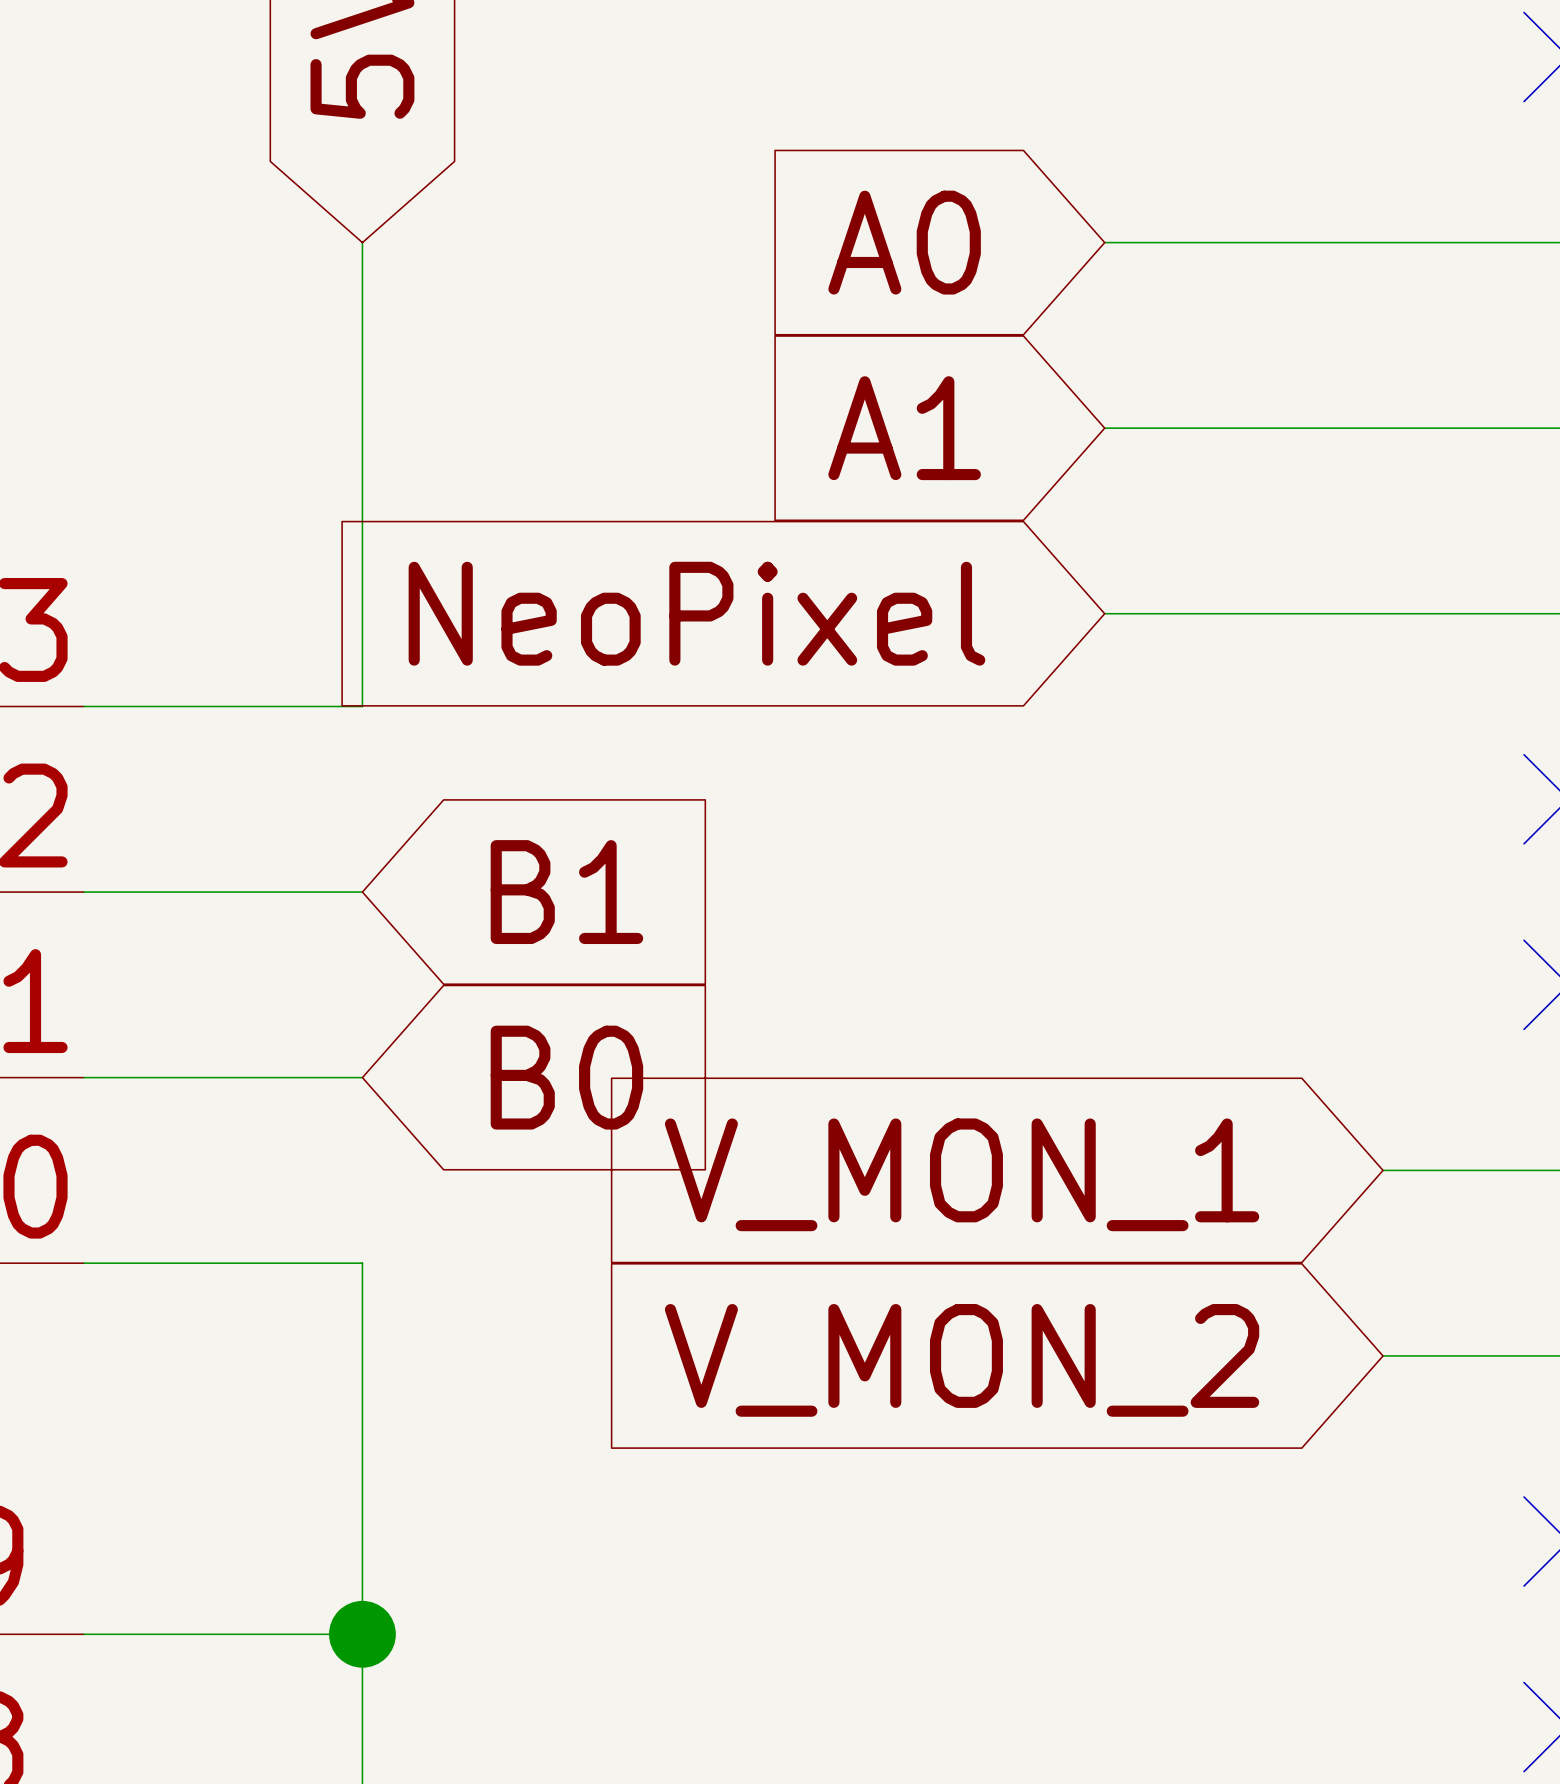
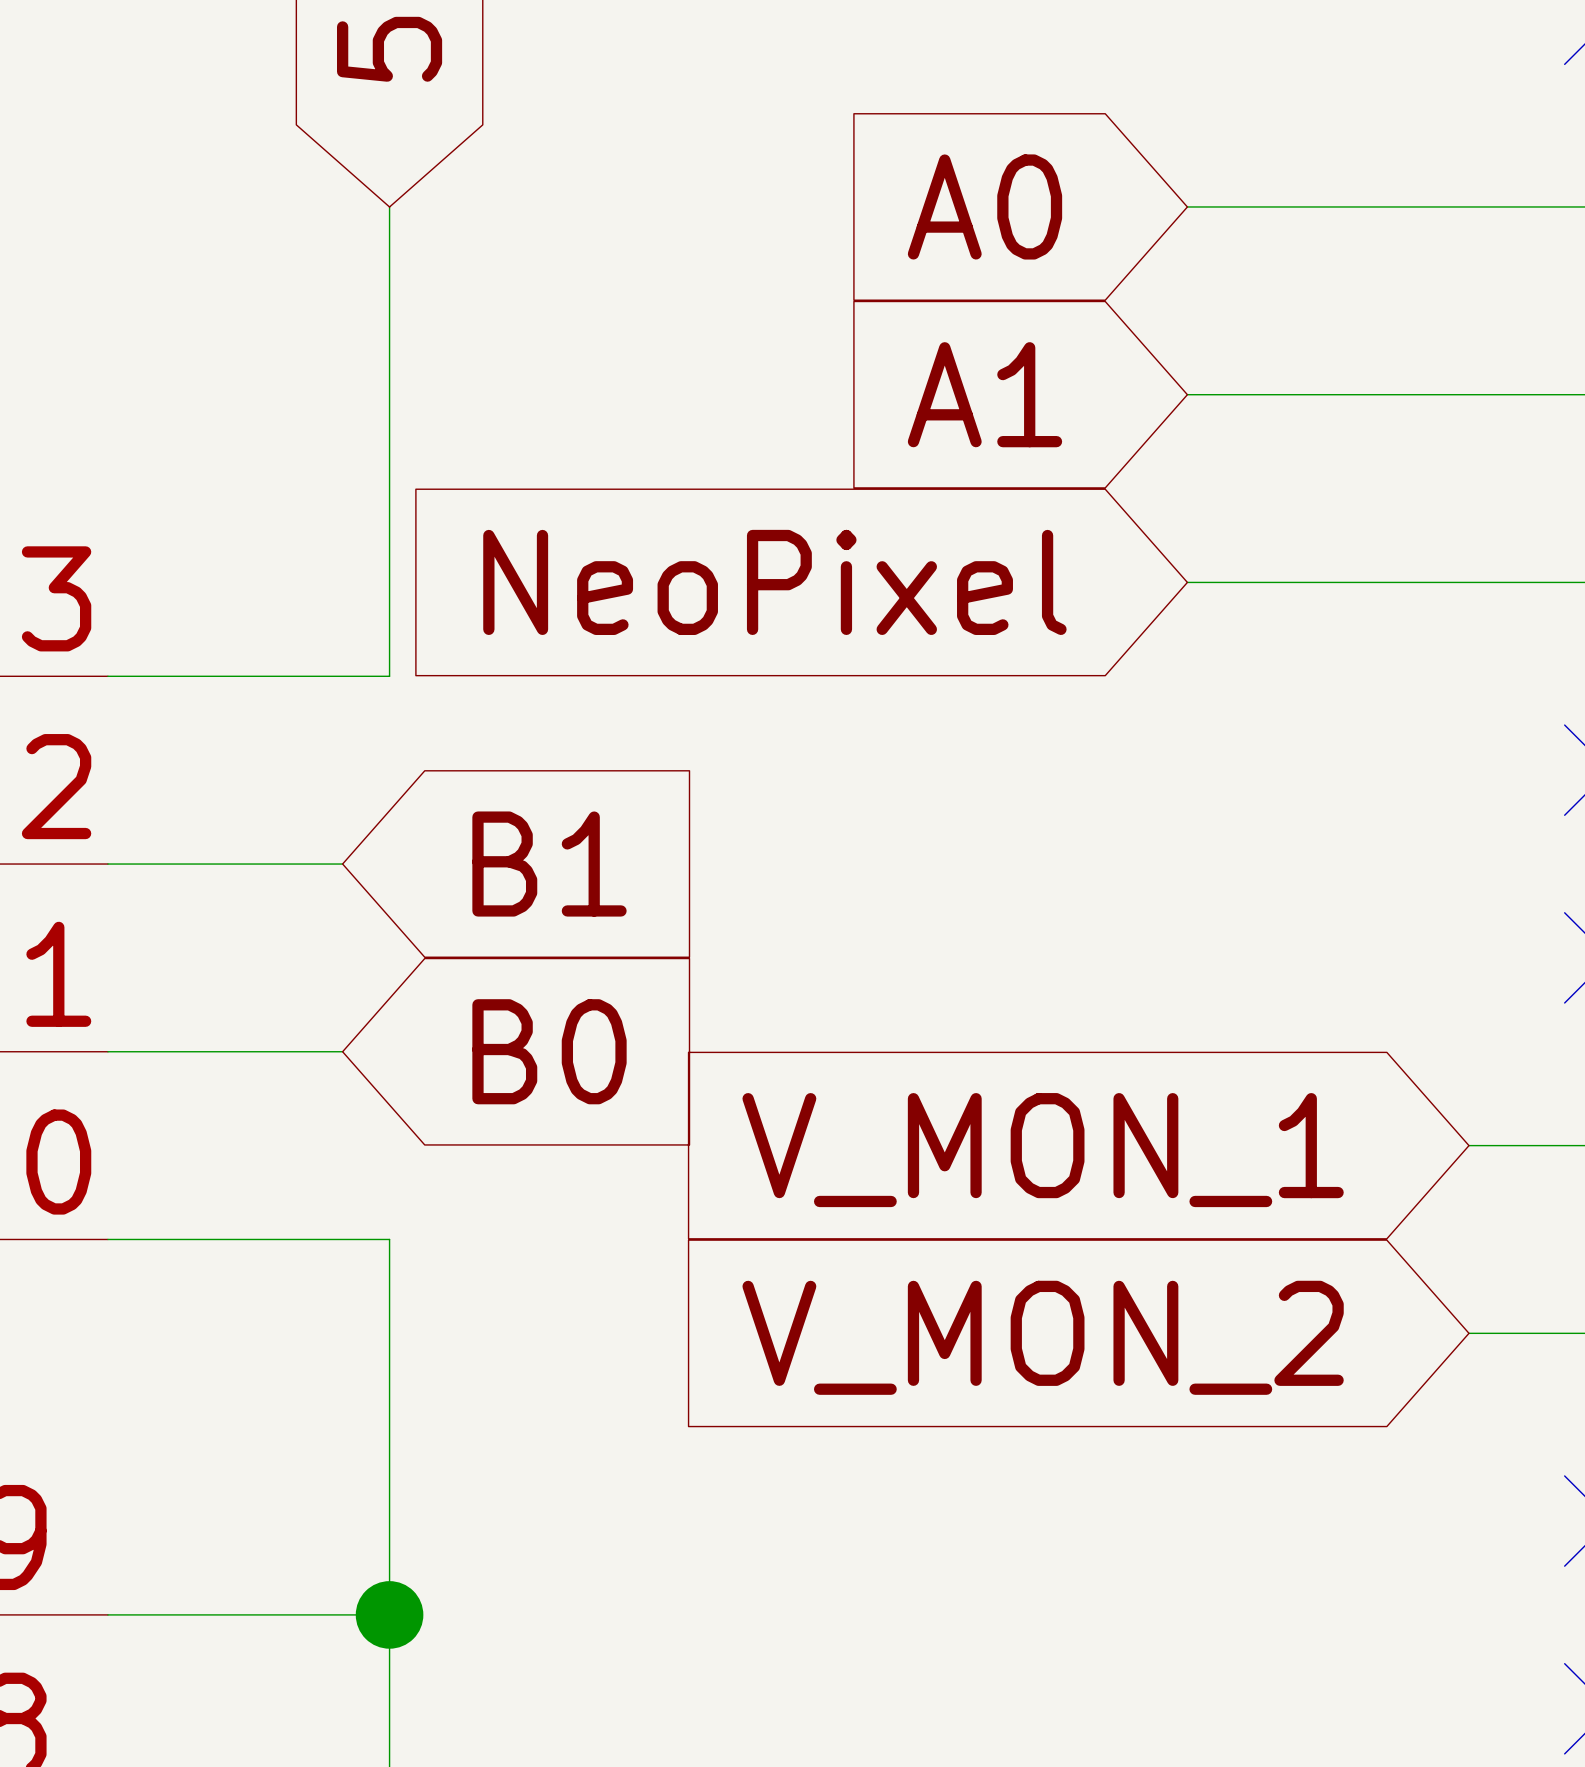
global label position: A0 (904, 242) -> A0 (984, 206)
wire: (1104, 242) (1151, 242) -> none
global label position: A1 (904, 428) -> A1 (984, 394)
wire: (1104, 428) (1151, 428) -> none
global label position: NeoPixel (696, 613) -> NeoPixel (774, 582)
wire: (1104, 613) (1151, 613) -> none
wire: (316, 892) (362, 892) -> none
global label position: B1 (566, 892) -> B1 (549, 864)
wire: (316, 1077) (362, 1077) -> none
global label position: B0 (566, 1077) -> B0 (549, 1051)
wire: (1383, 1170) (1429, 1170) -> none
global label position: V_MON_1 (962, 1174) -> V_MON_1 (1043, 1150)
wire: (1383, 1355) (1429, 1355) -> none
global label position: V_MON_2 (962, 1360) -> V_MON_2 (1043, 1337)

